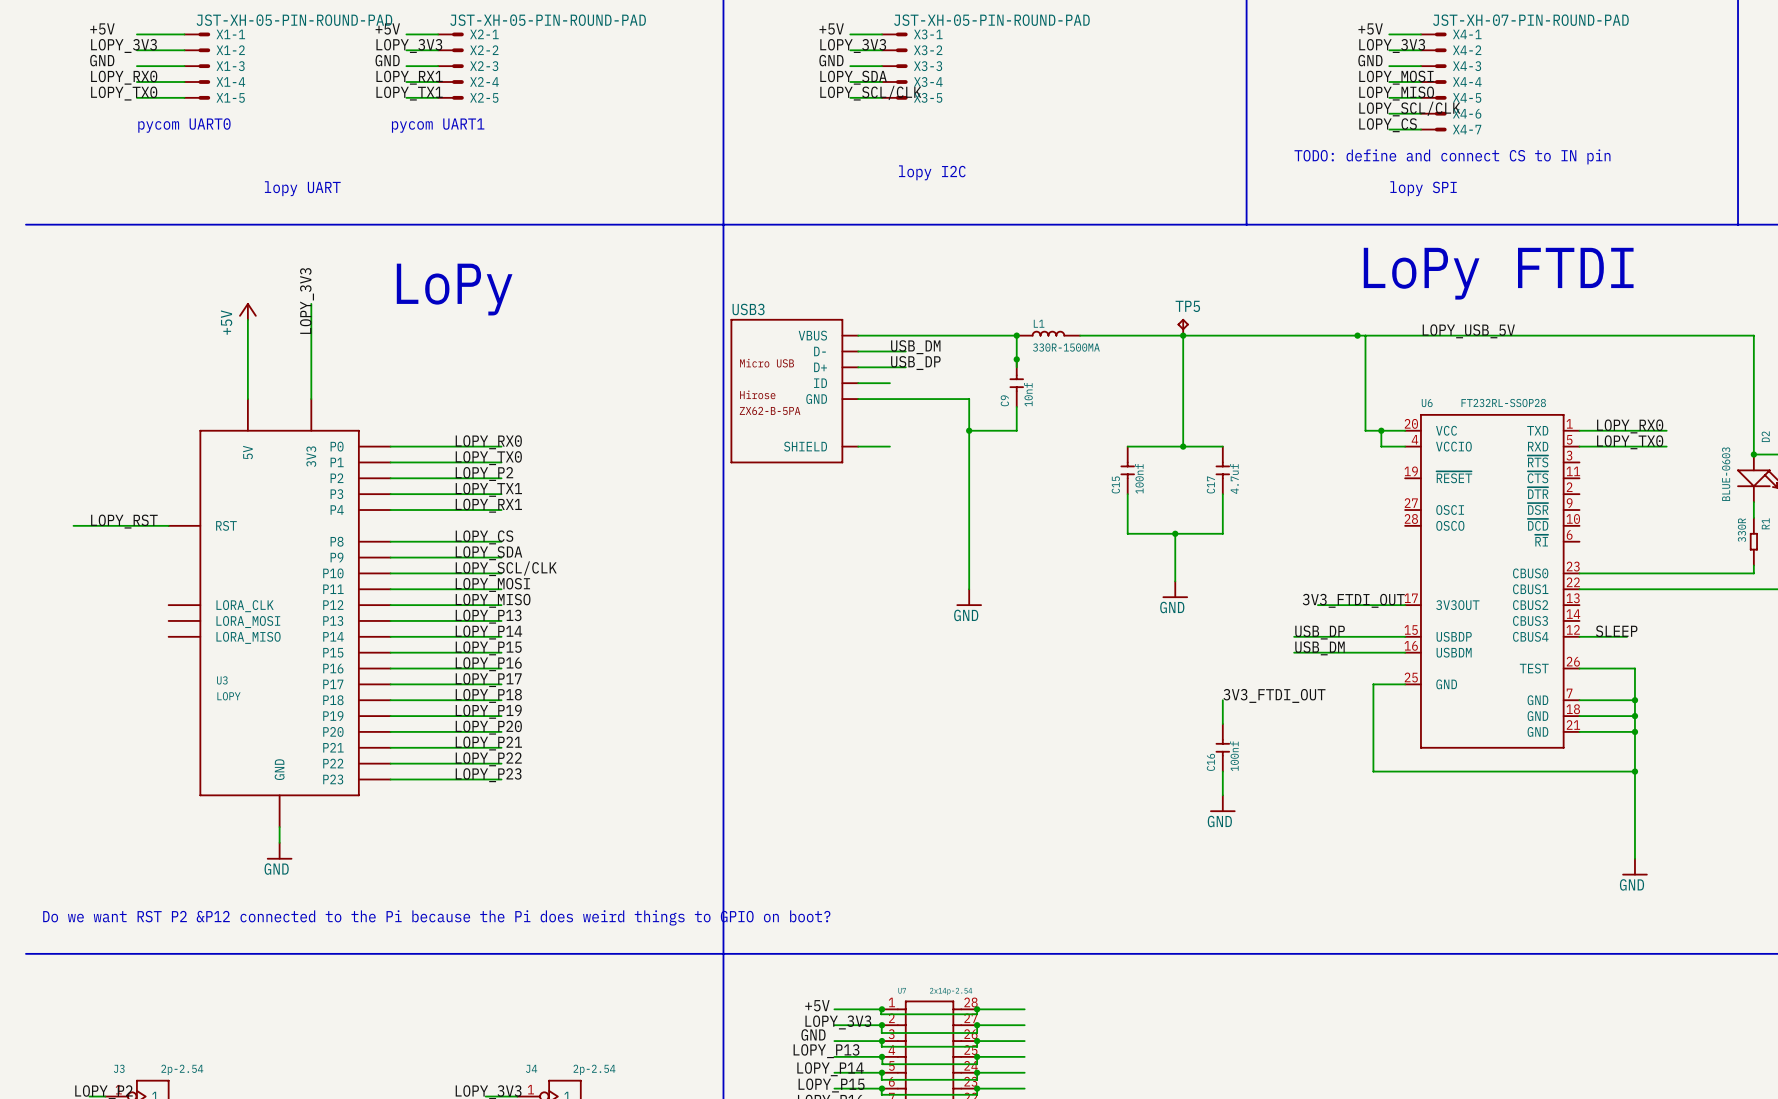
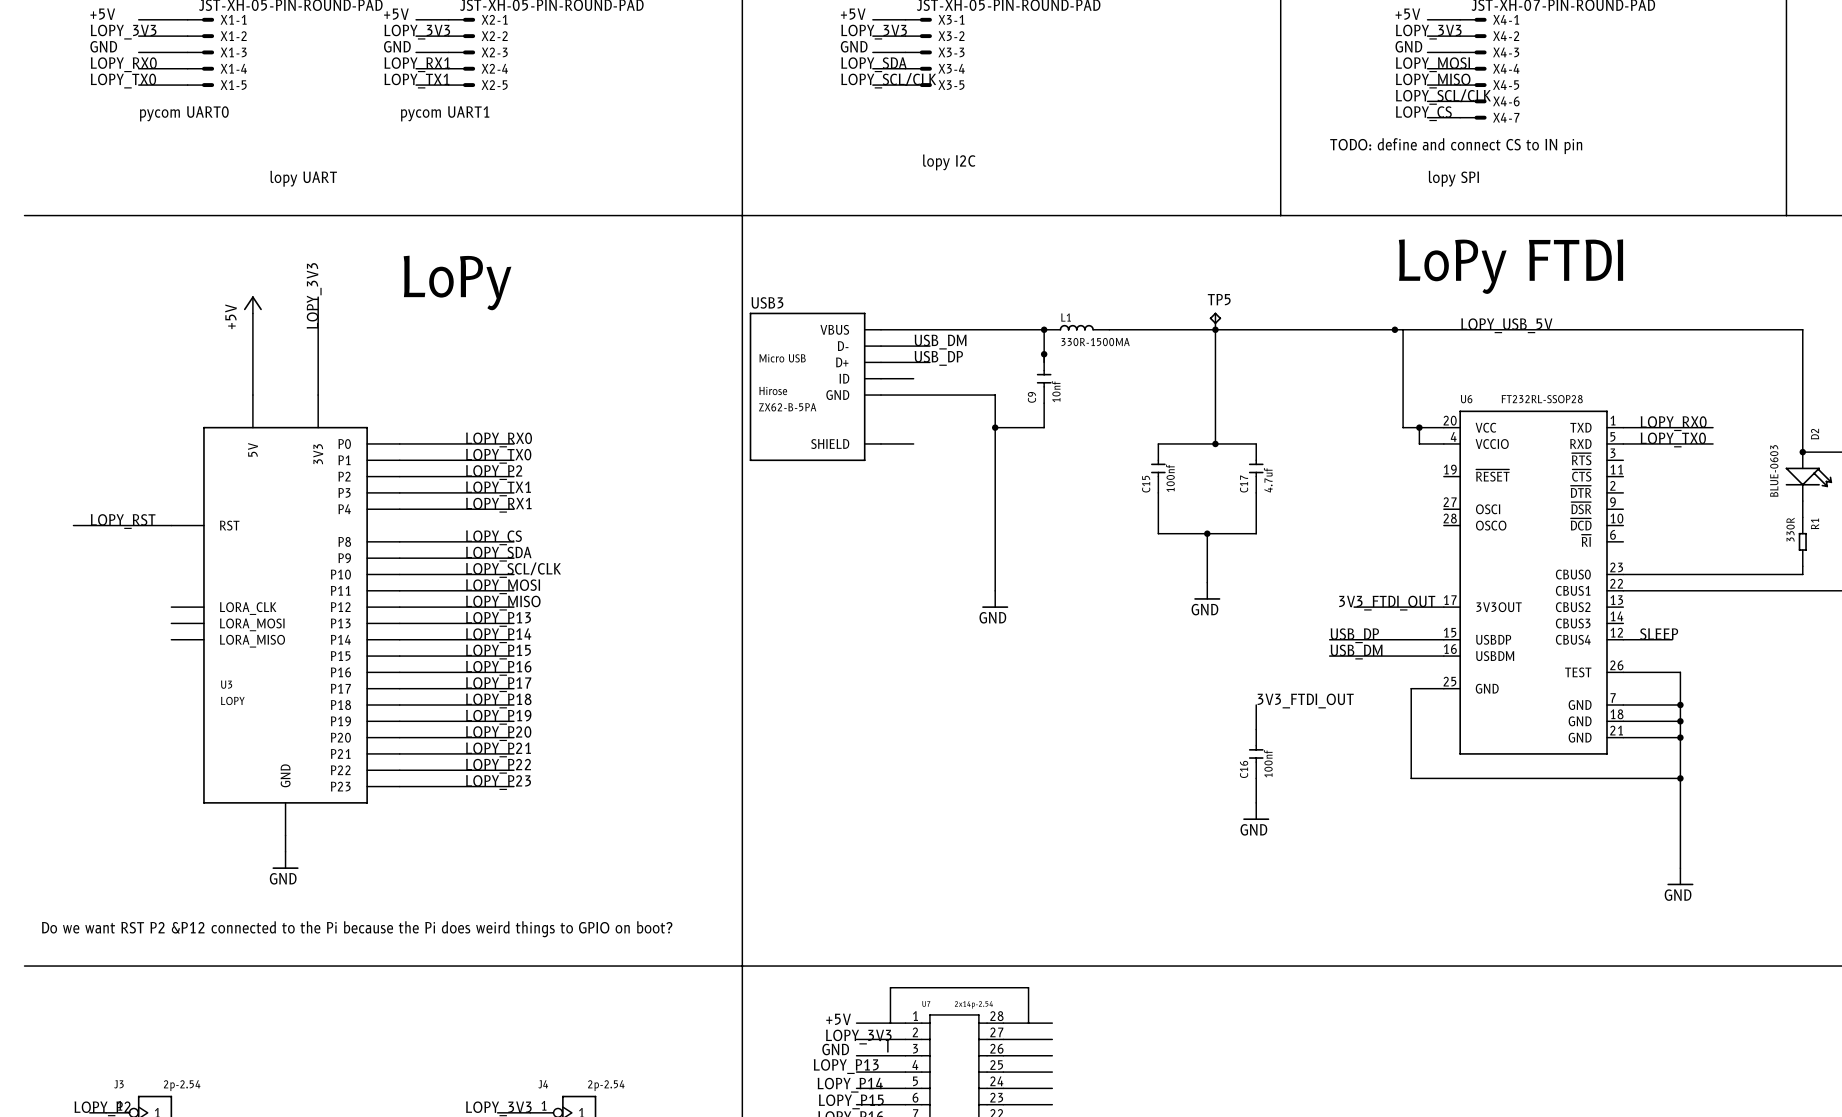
wire: none -> (890, 1023) (890, 987) (1028, 987) (1028, 1023)
wire: (881, 1009) (881, 1014) (977, 1014) (977, 1009) -> none
junction: (881, 1009) -> none
junction: (977, 1009) -> none
wire: none -> (887, 1039) (887, 1051)
wire: (881, 1025) (881, 1033) (977, 1033) (977, 1025) -> none
junction: (881, 1025) -> none
junction: (977, 1025) -> none
wire: (881, 1041) (881, 1046) (977, 1046) (977, 1041) -> none
junction: (881, 1041) -> none
junction: (977, 1041) -> none
wire: (881, 1056) (882, 1064) (977, 1064) (977, 1056) -> none
junction: (881, 1056) -> none
junction: (977, 1056) -> none
wire: (881, 1072) (881, 1079) (977, 1079) (977, 1072) -> none
junction: (881, 1072) -> none
junction: (977, 1072) -> none
wire: (881, 1088) (881, 1094) (977, 1094) (977, 1088) -> none
junction: (881, 1088) -> none
junction: (977, 1088) -> none

